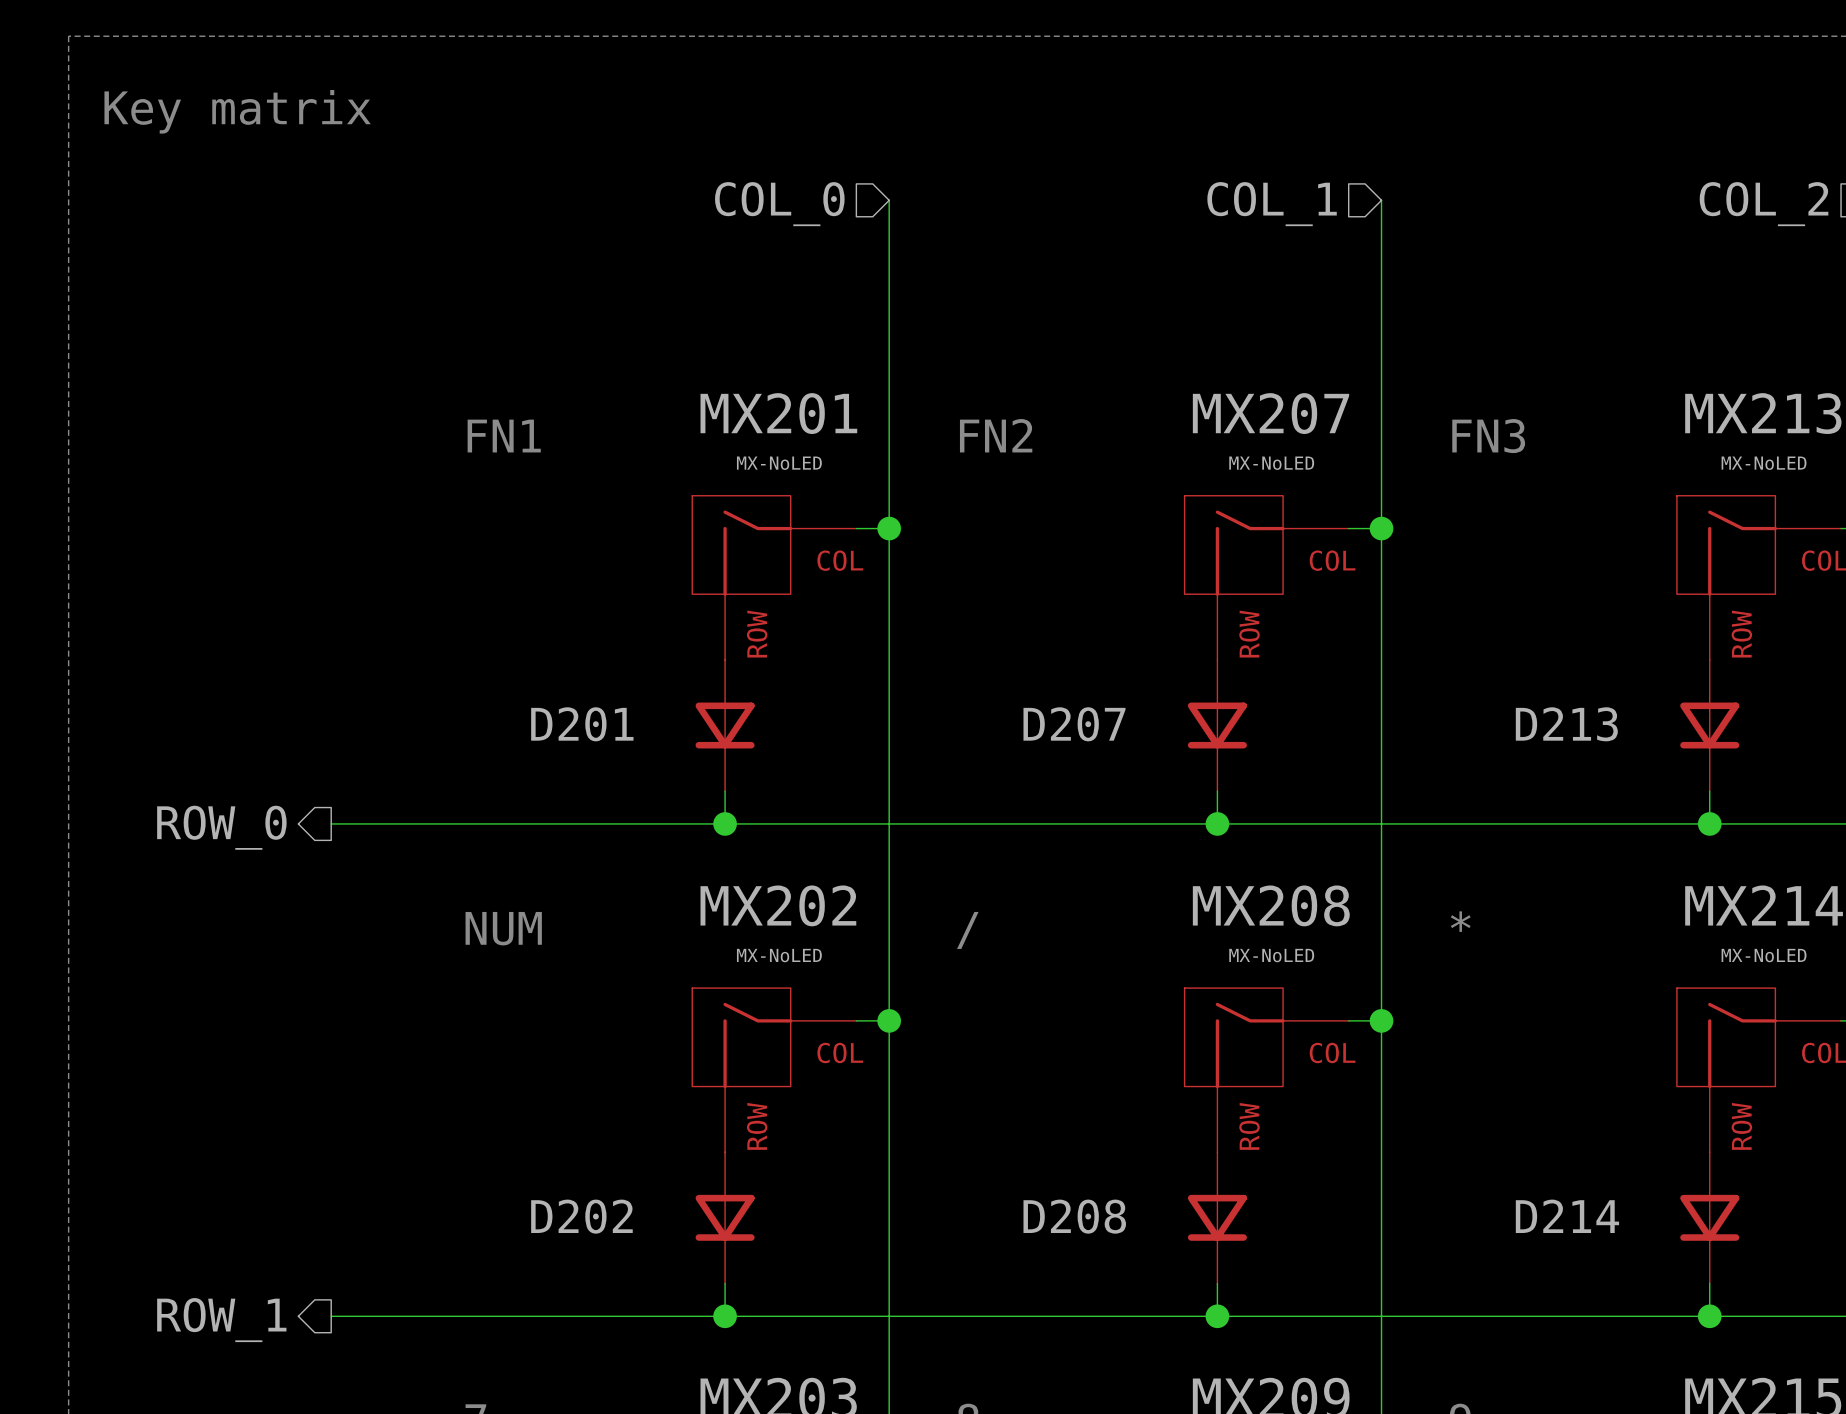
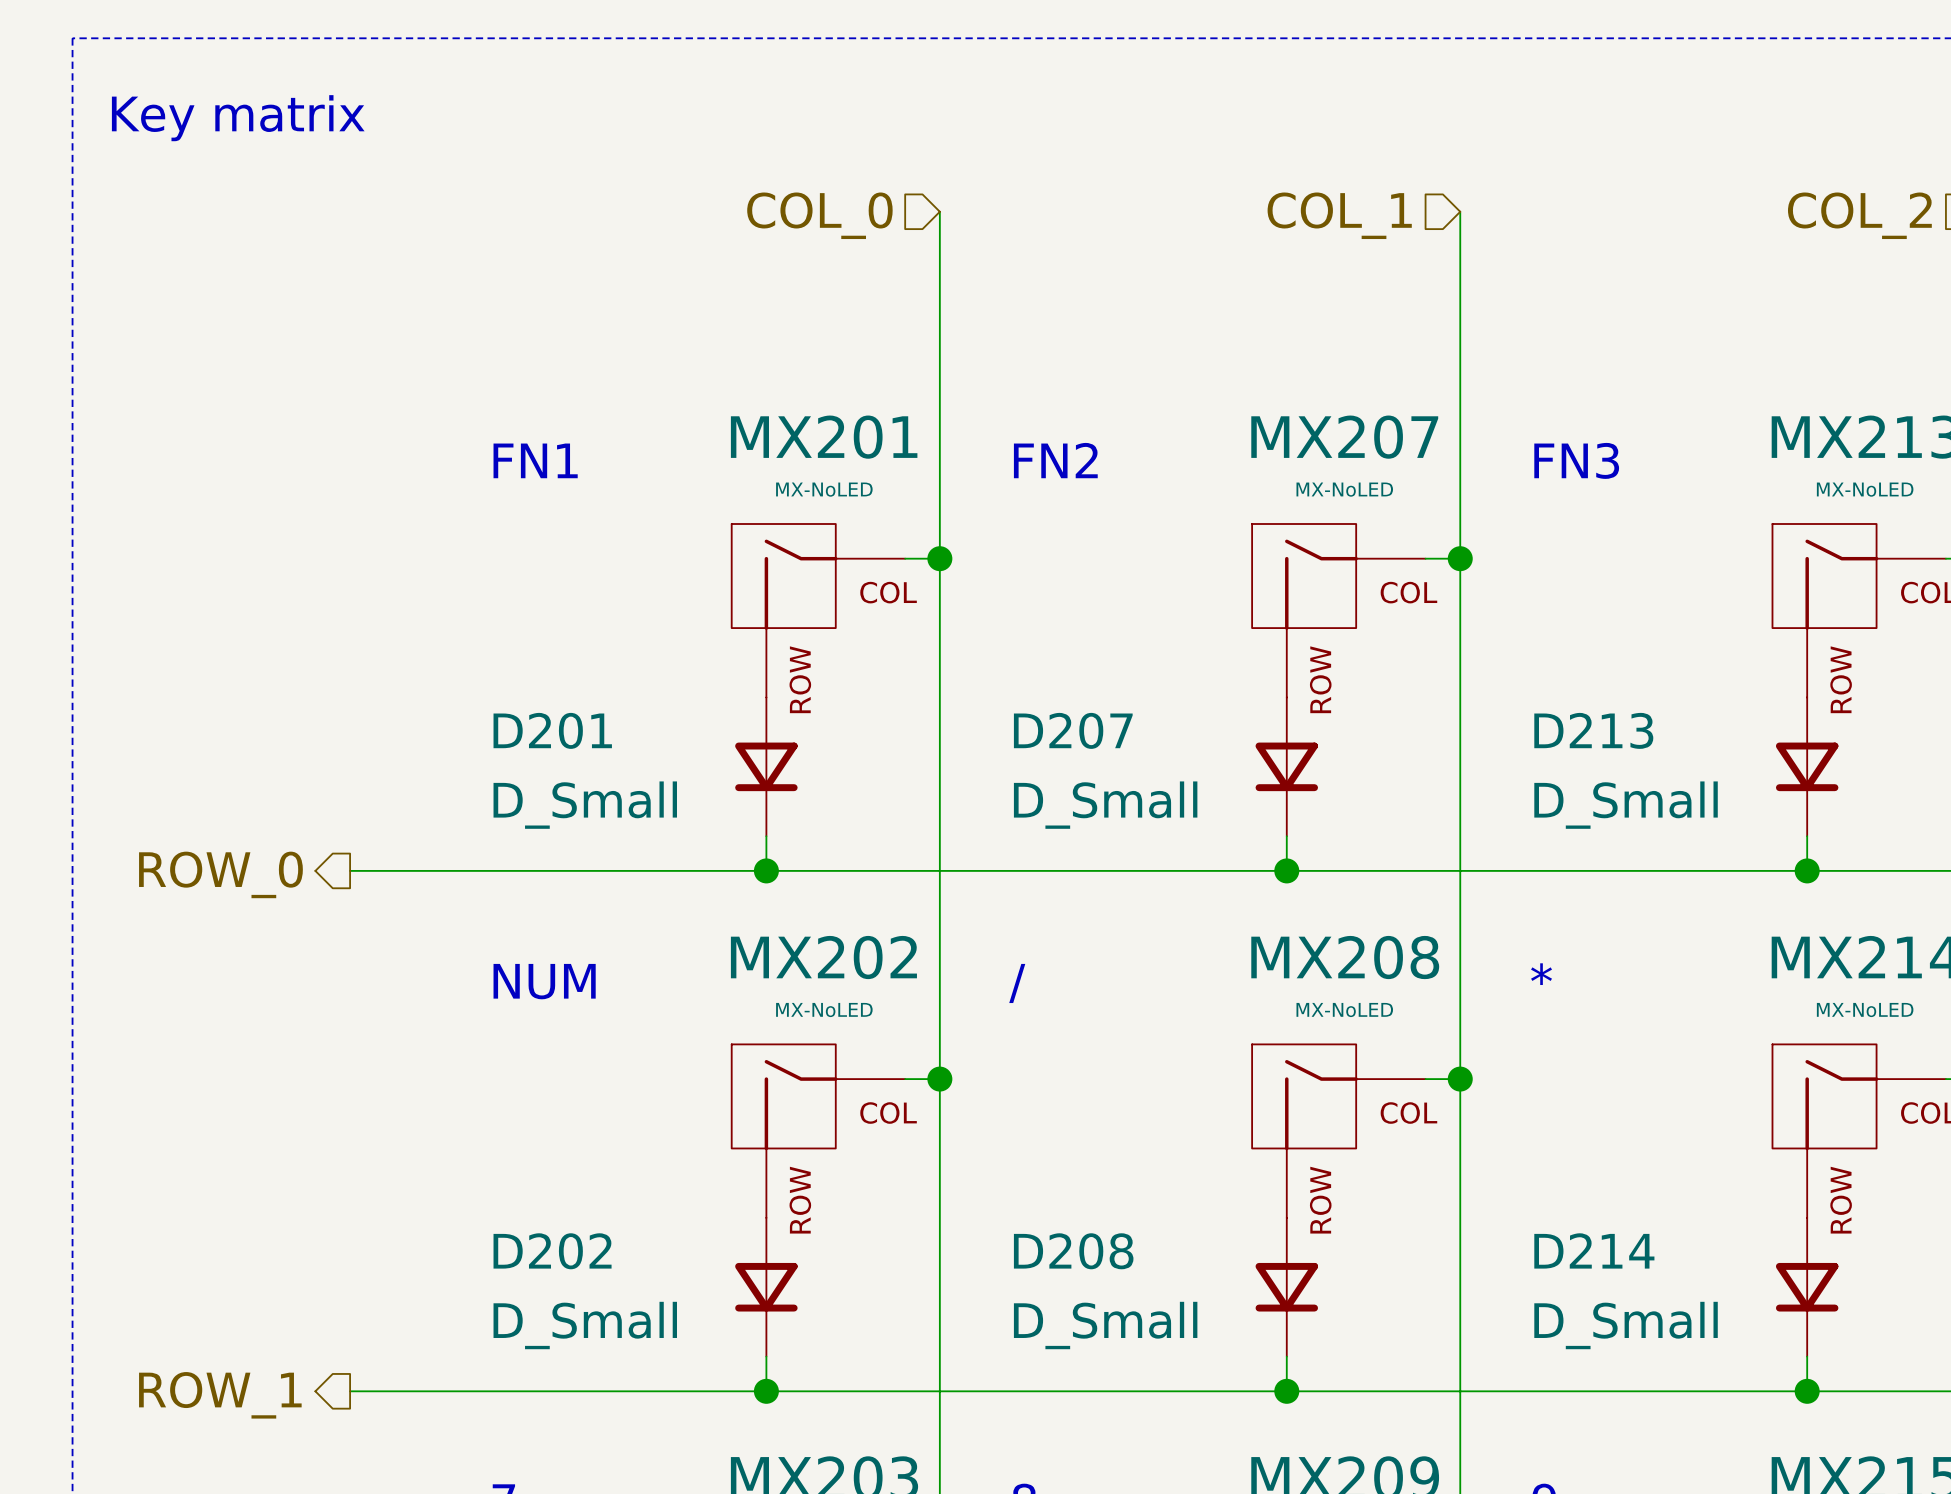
D201 name position: D201 (582, 724) -> D201 (552, 730)
D207 name position: D207 (1074, 724) -> D207 (1073, 730)
D213 name position: D213 (1566, 724) -> D213 (1593, 730)
D201 value: none -> D_Small (585, 805)
D207 value: none -> D_Small (1105, 805)
D213 value: none -> D_Small (1626, 805)
D202 name position: D202 (581, 1216) -> D202 (552, 1251)
D208 name position: D208 (1074, 1216) -> D208 (1073, 1251)
D214 name position: D214 (1567, 1216) -> D214 (1594, 1250)
D202 value: none -> D_Small (585, 1325)
D208 value: none -> D_Small (1105, 1325)
D214 value: none -> D_Small (1626, 1325)

